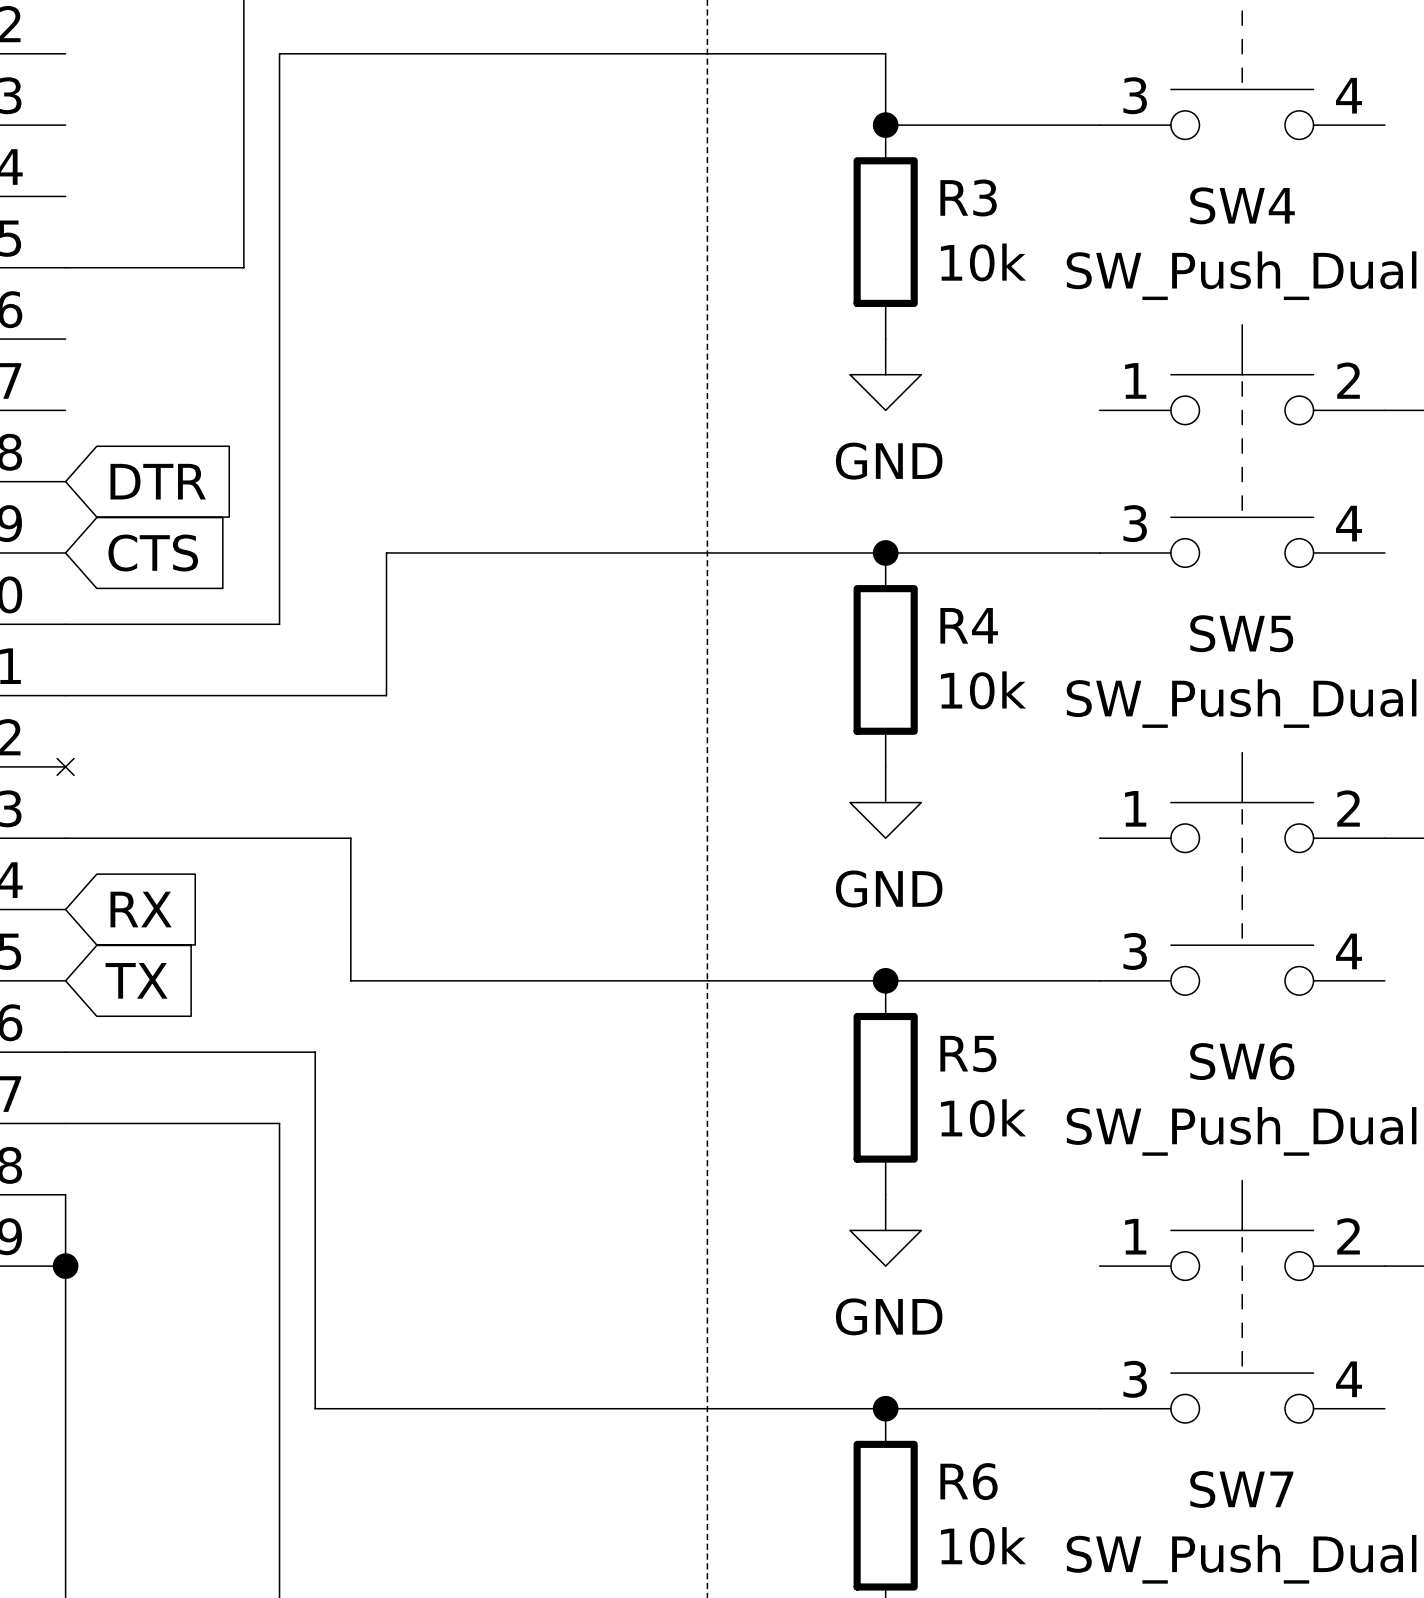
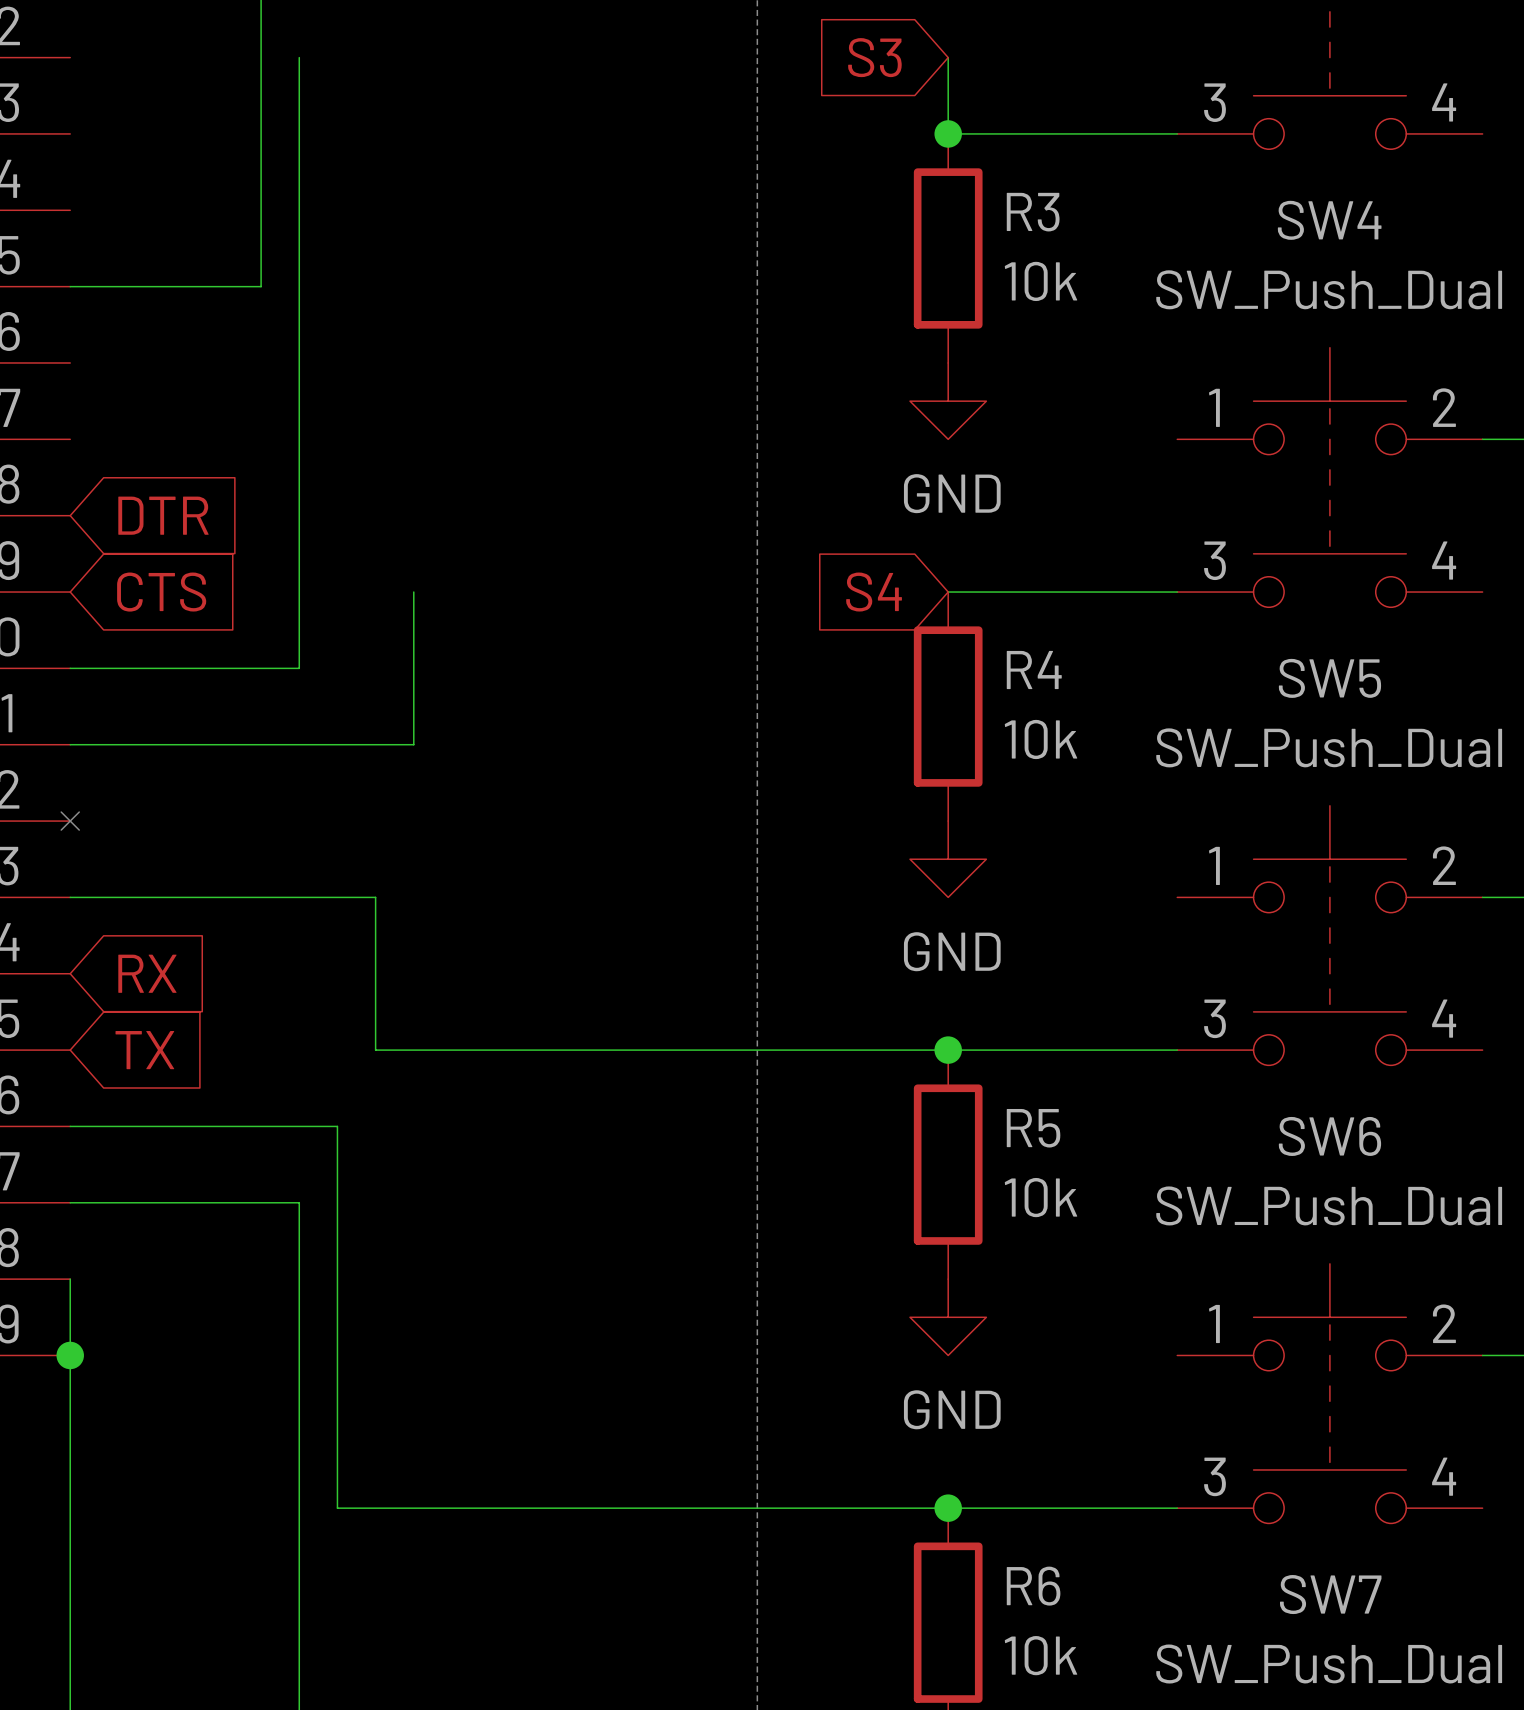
wire: (279, 53) (885, 53) -> none
global label: none -> S3 (874, 57)
wire: (386, 552) (885, 552) -> none
junction: (885, 552) -> none
global label: none -> S4 (874, 592)

